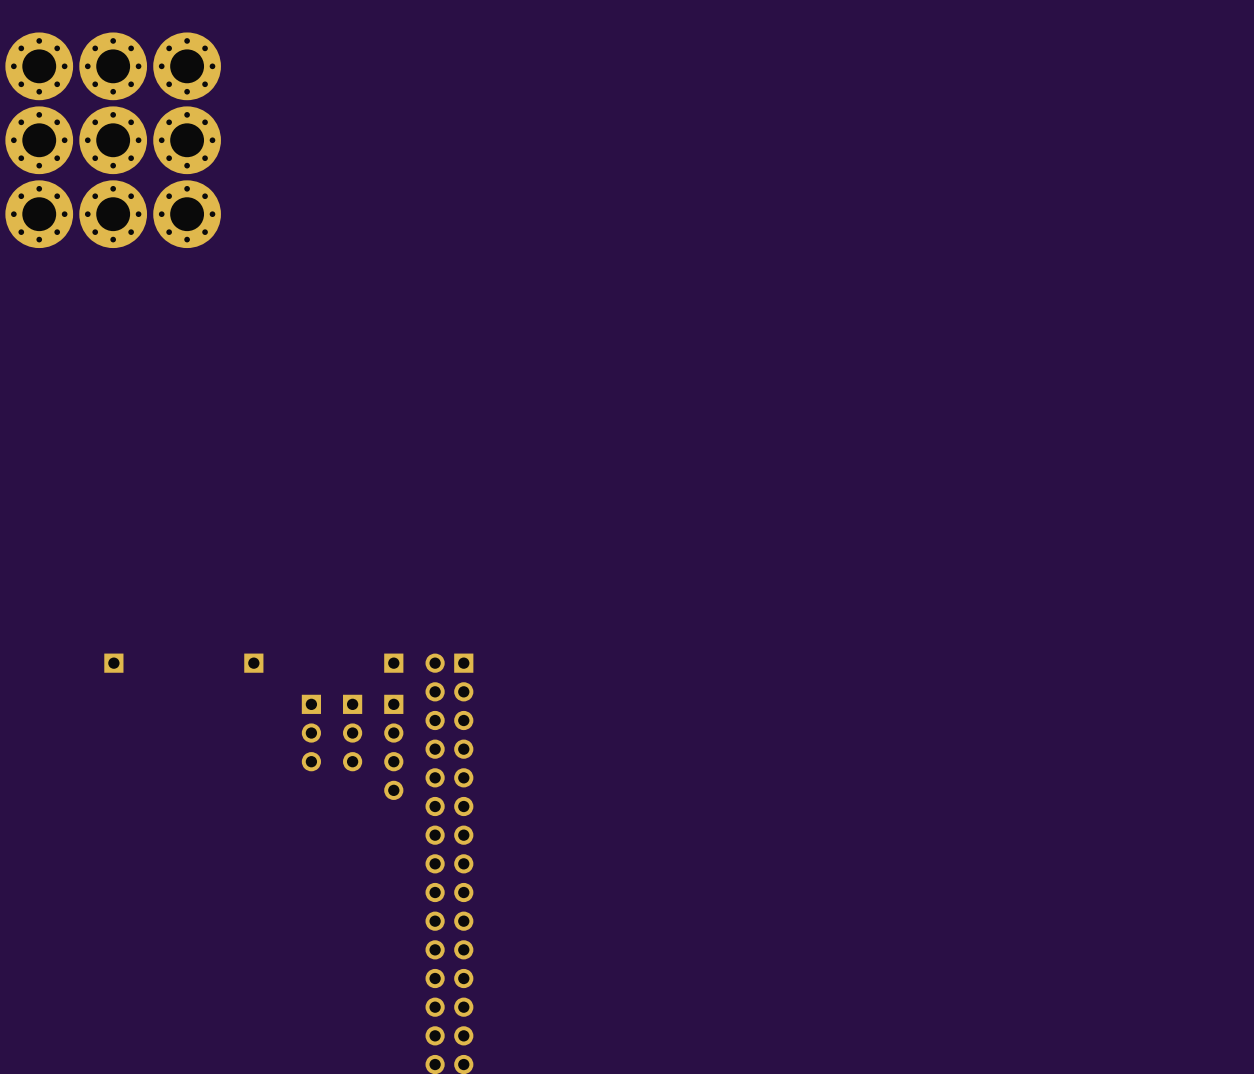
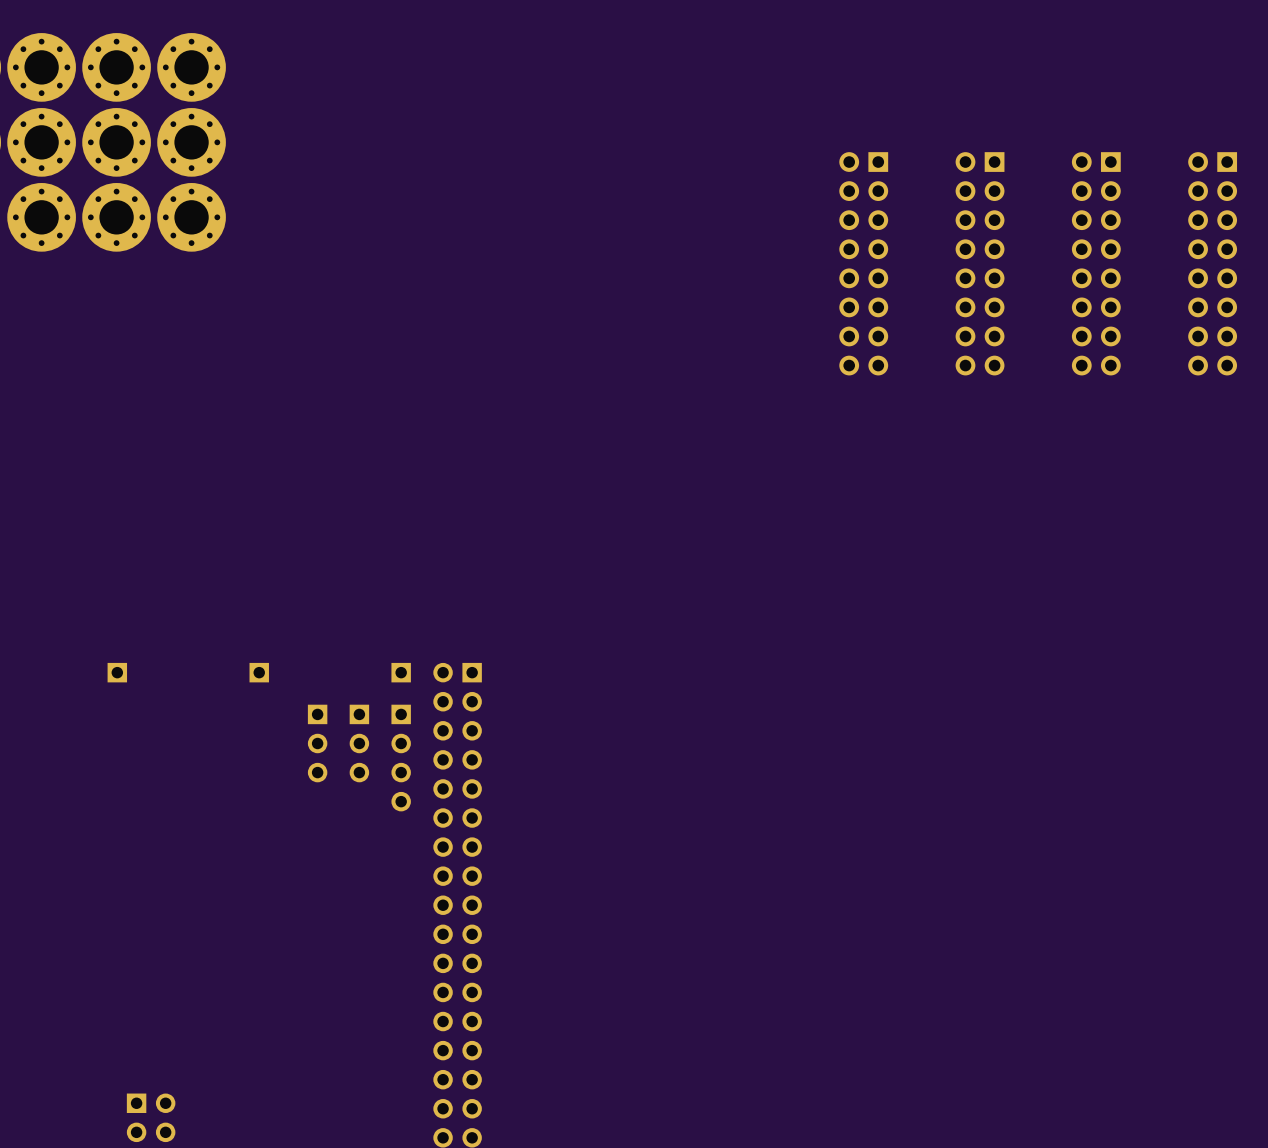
part: none -> (863, 263)
part: none -> (980, 263)
part: none -> (1096, 263)
part: none -> (1212, 263)

